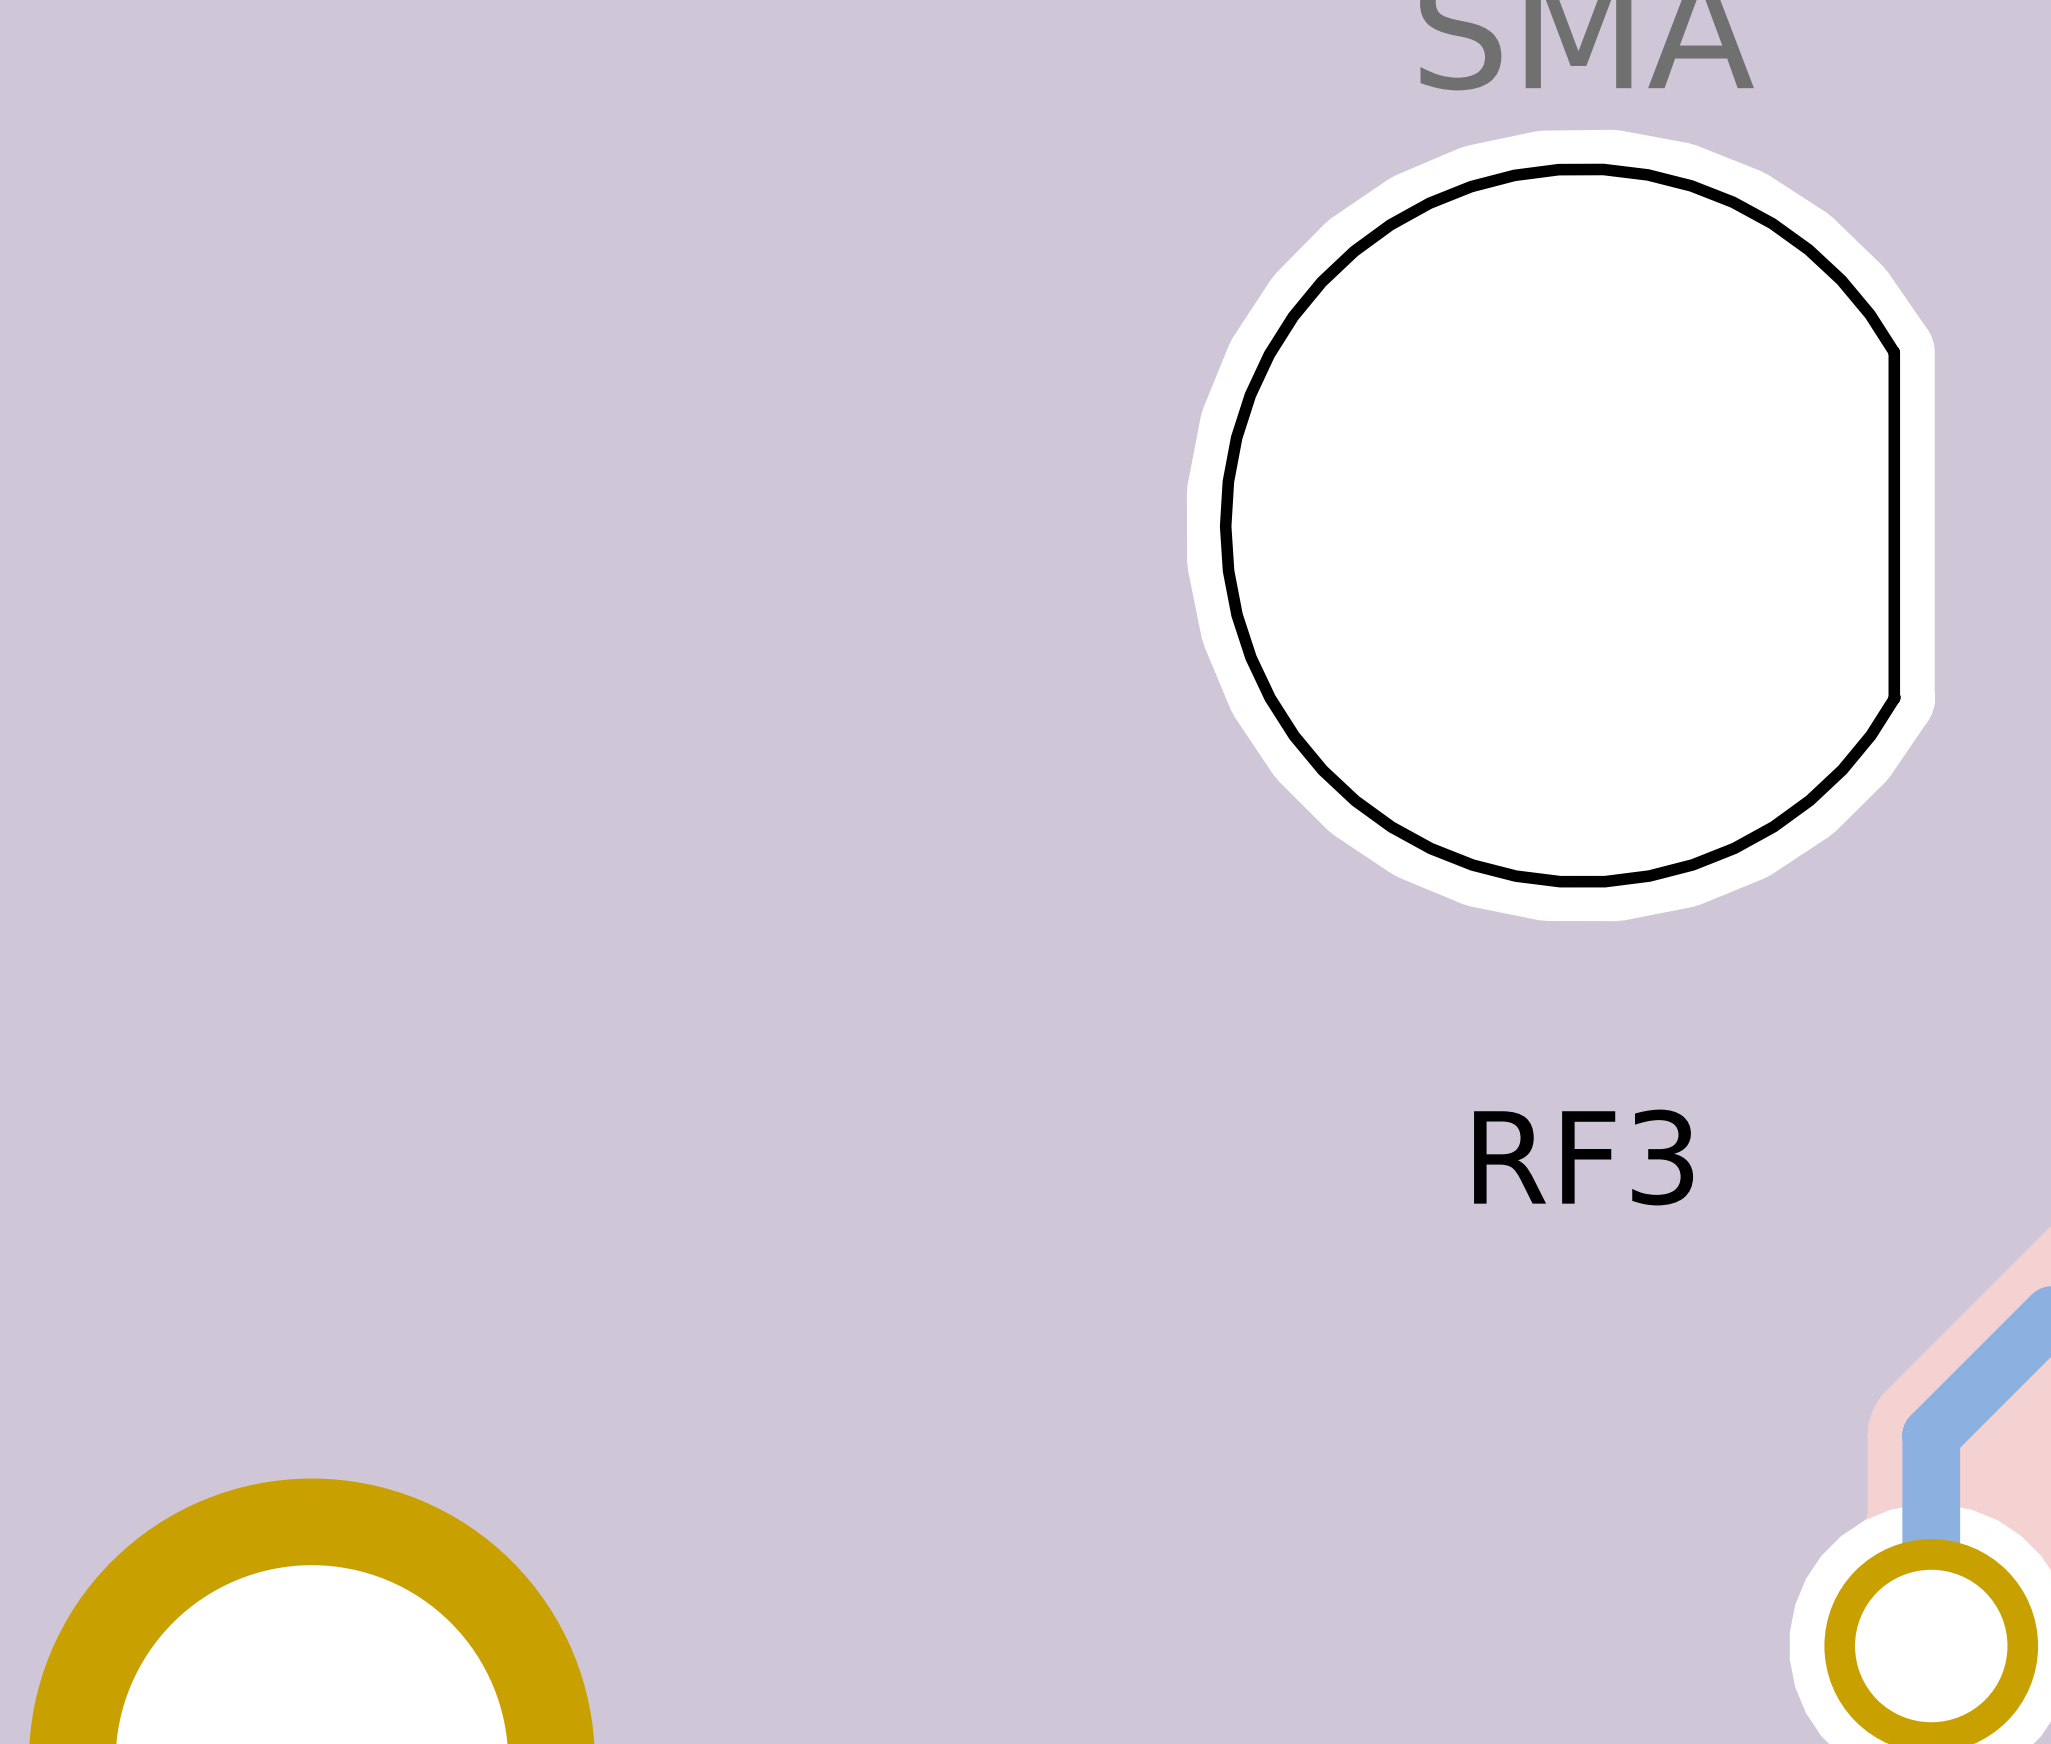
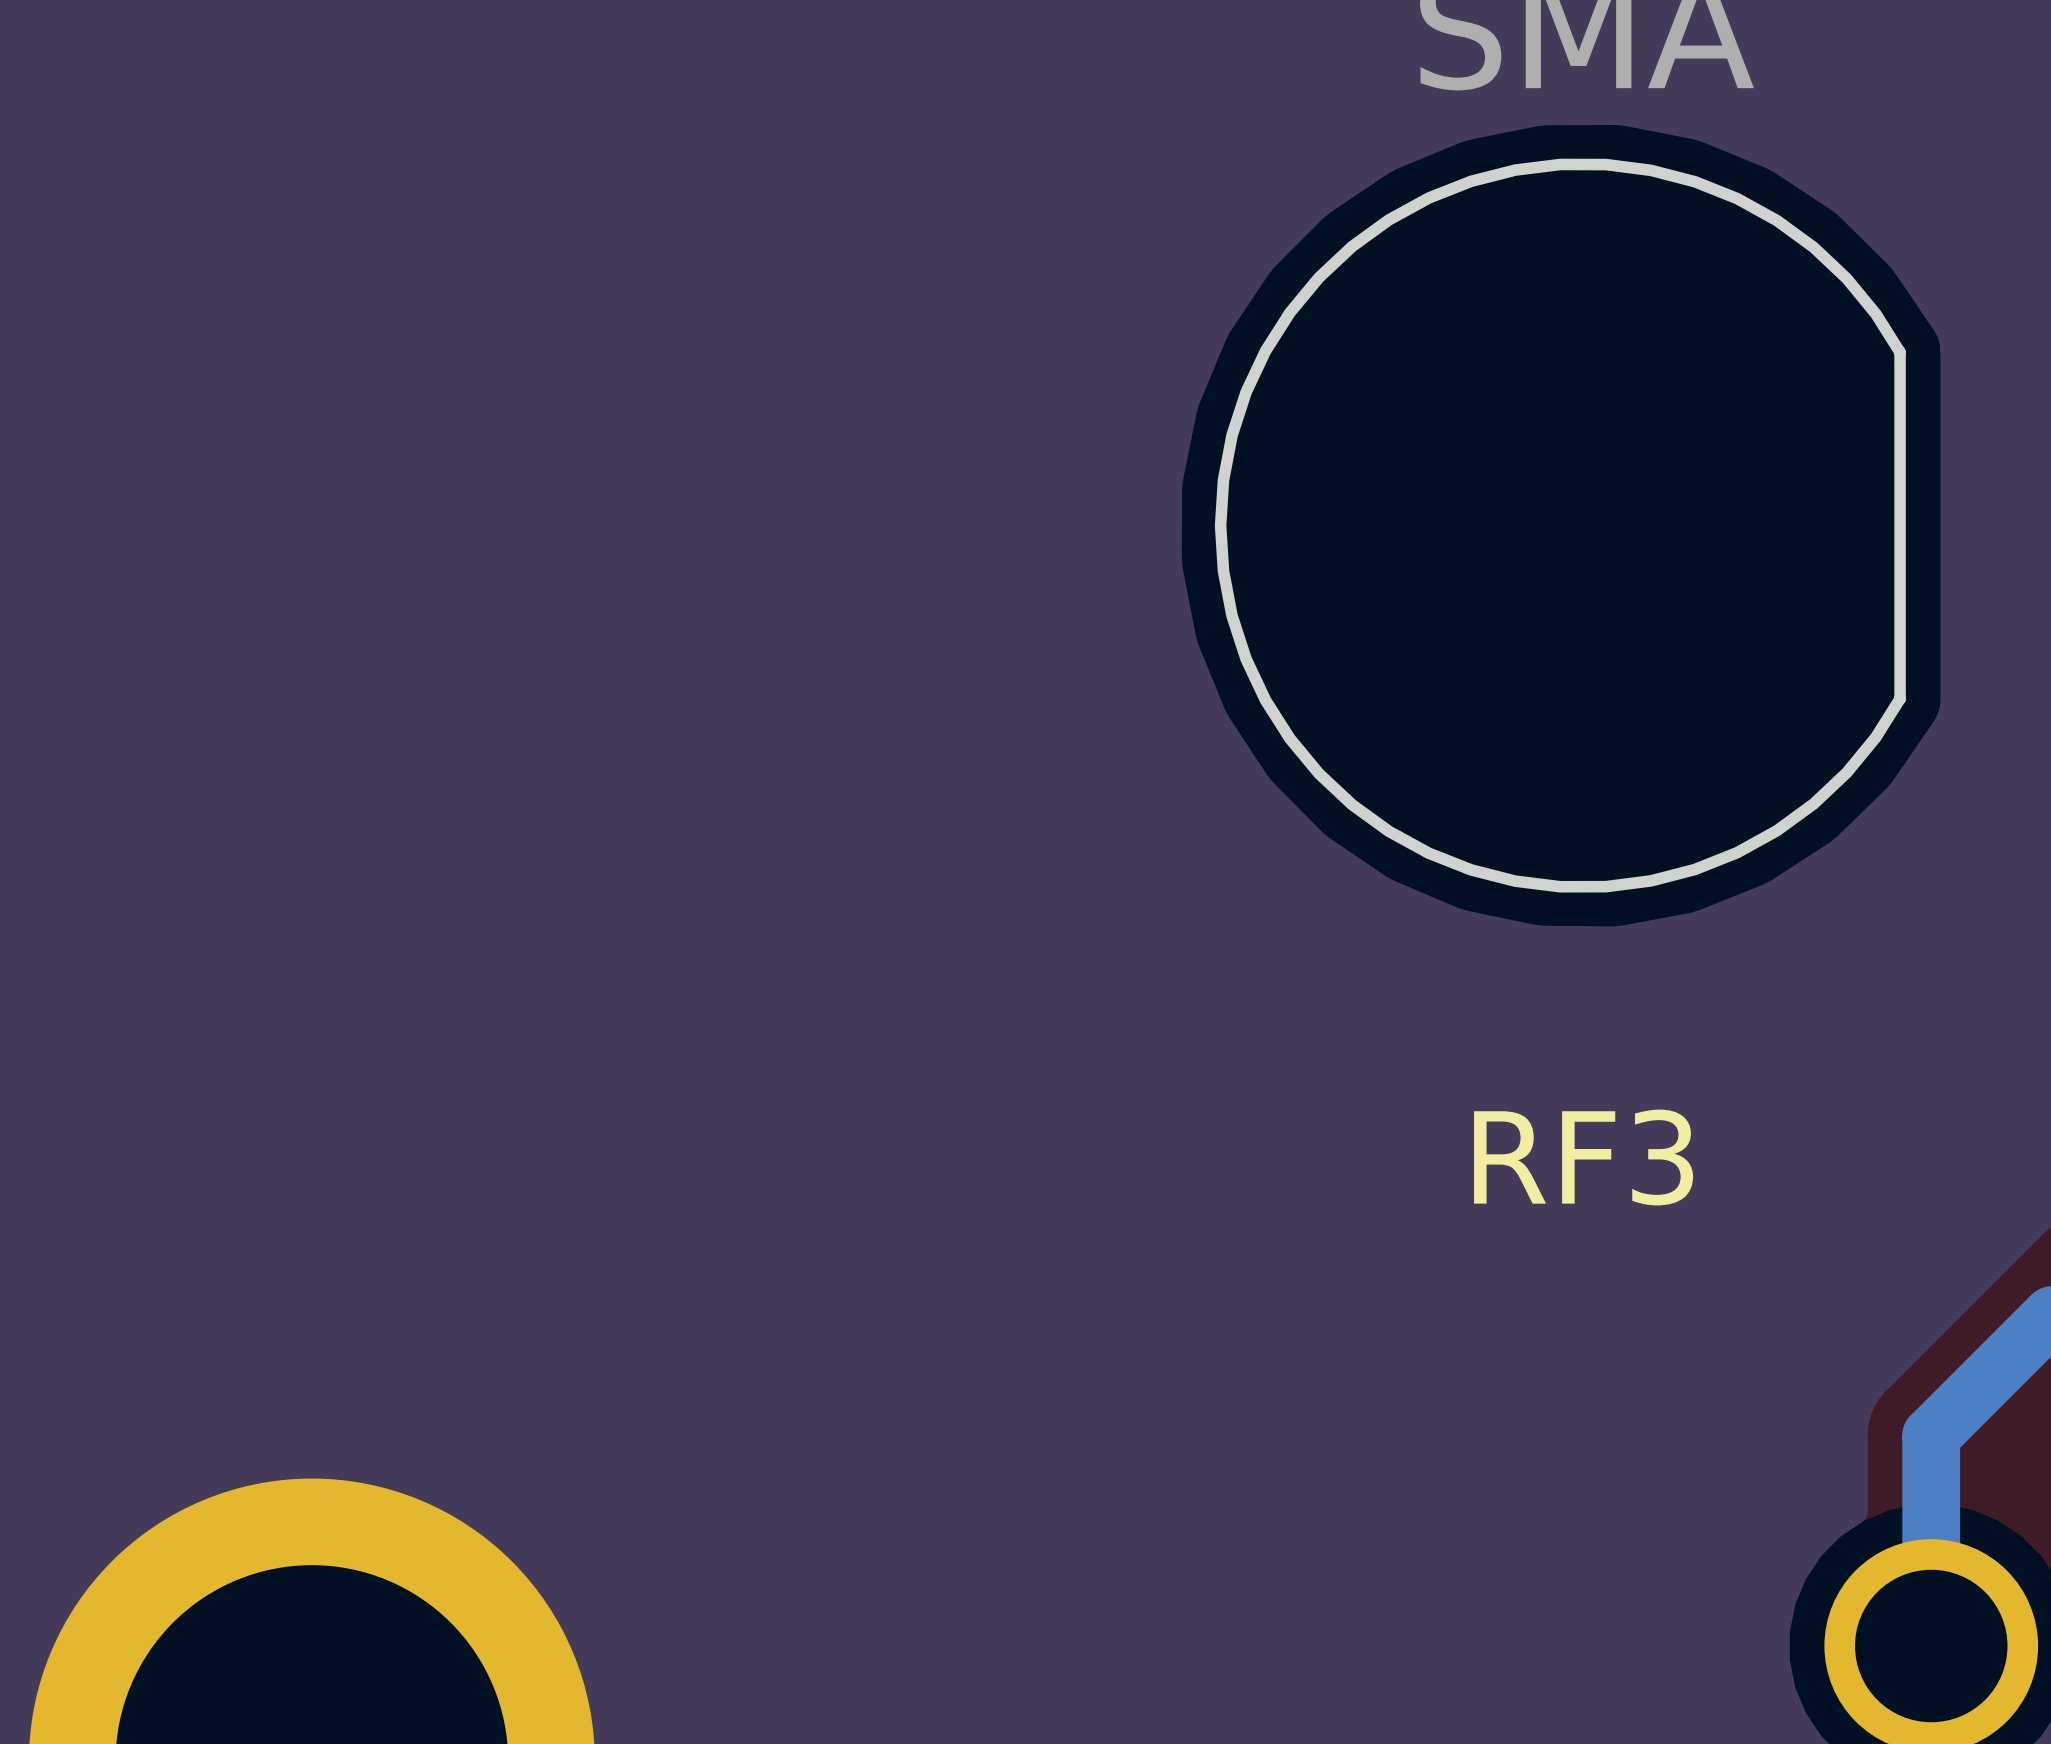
RF3 footprint: [1219, 163, 1901, 888] -> [1214, 158, 1906, 893]

